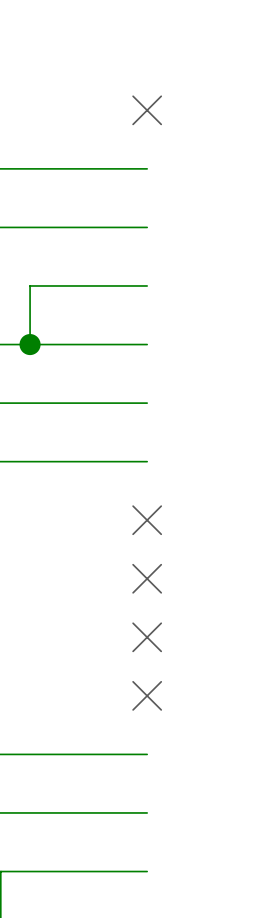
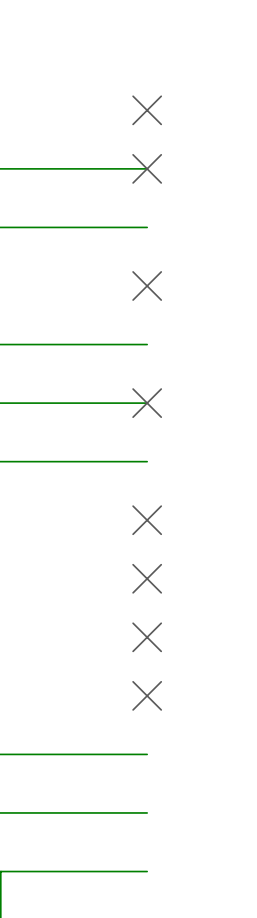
no-connect mark: none -> (147, 168)
wire: (147, 285) (30, 285) (30, 344) -> none
no-connect mark: none -> (147, 285)
junction: (30, 344) -> none
no-connect mark: none -> (147, 403)

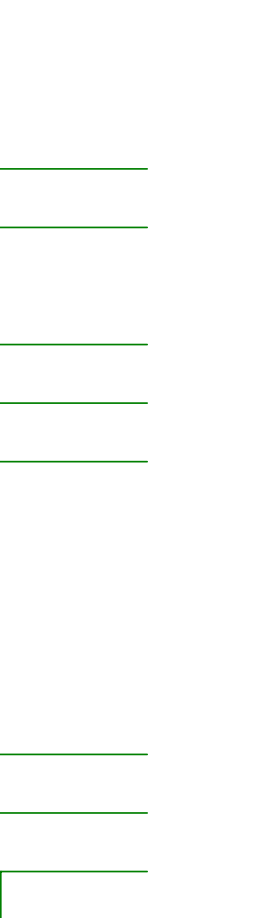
no-connect mark: (147, 110) -> none
no-connect mark: (147, 168) -> none
no-connect mark: (147, 285) -> none
no-connect mark: (147, 403) -> none
no-connect mark: (147, 520) -> none
no-connect mark: (147, 578) -> none
no-connect mark: (147, 637) -> none
no-connect mark: (147, 695) -> none

